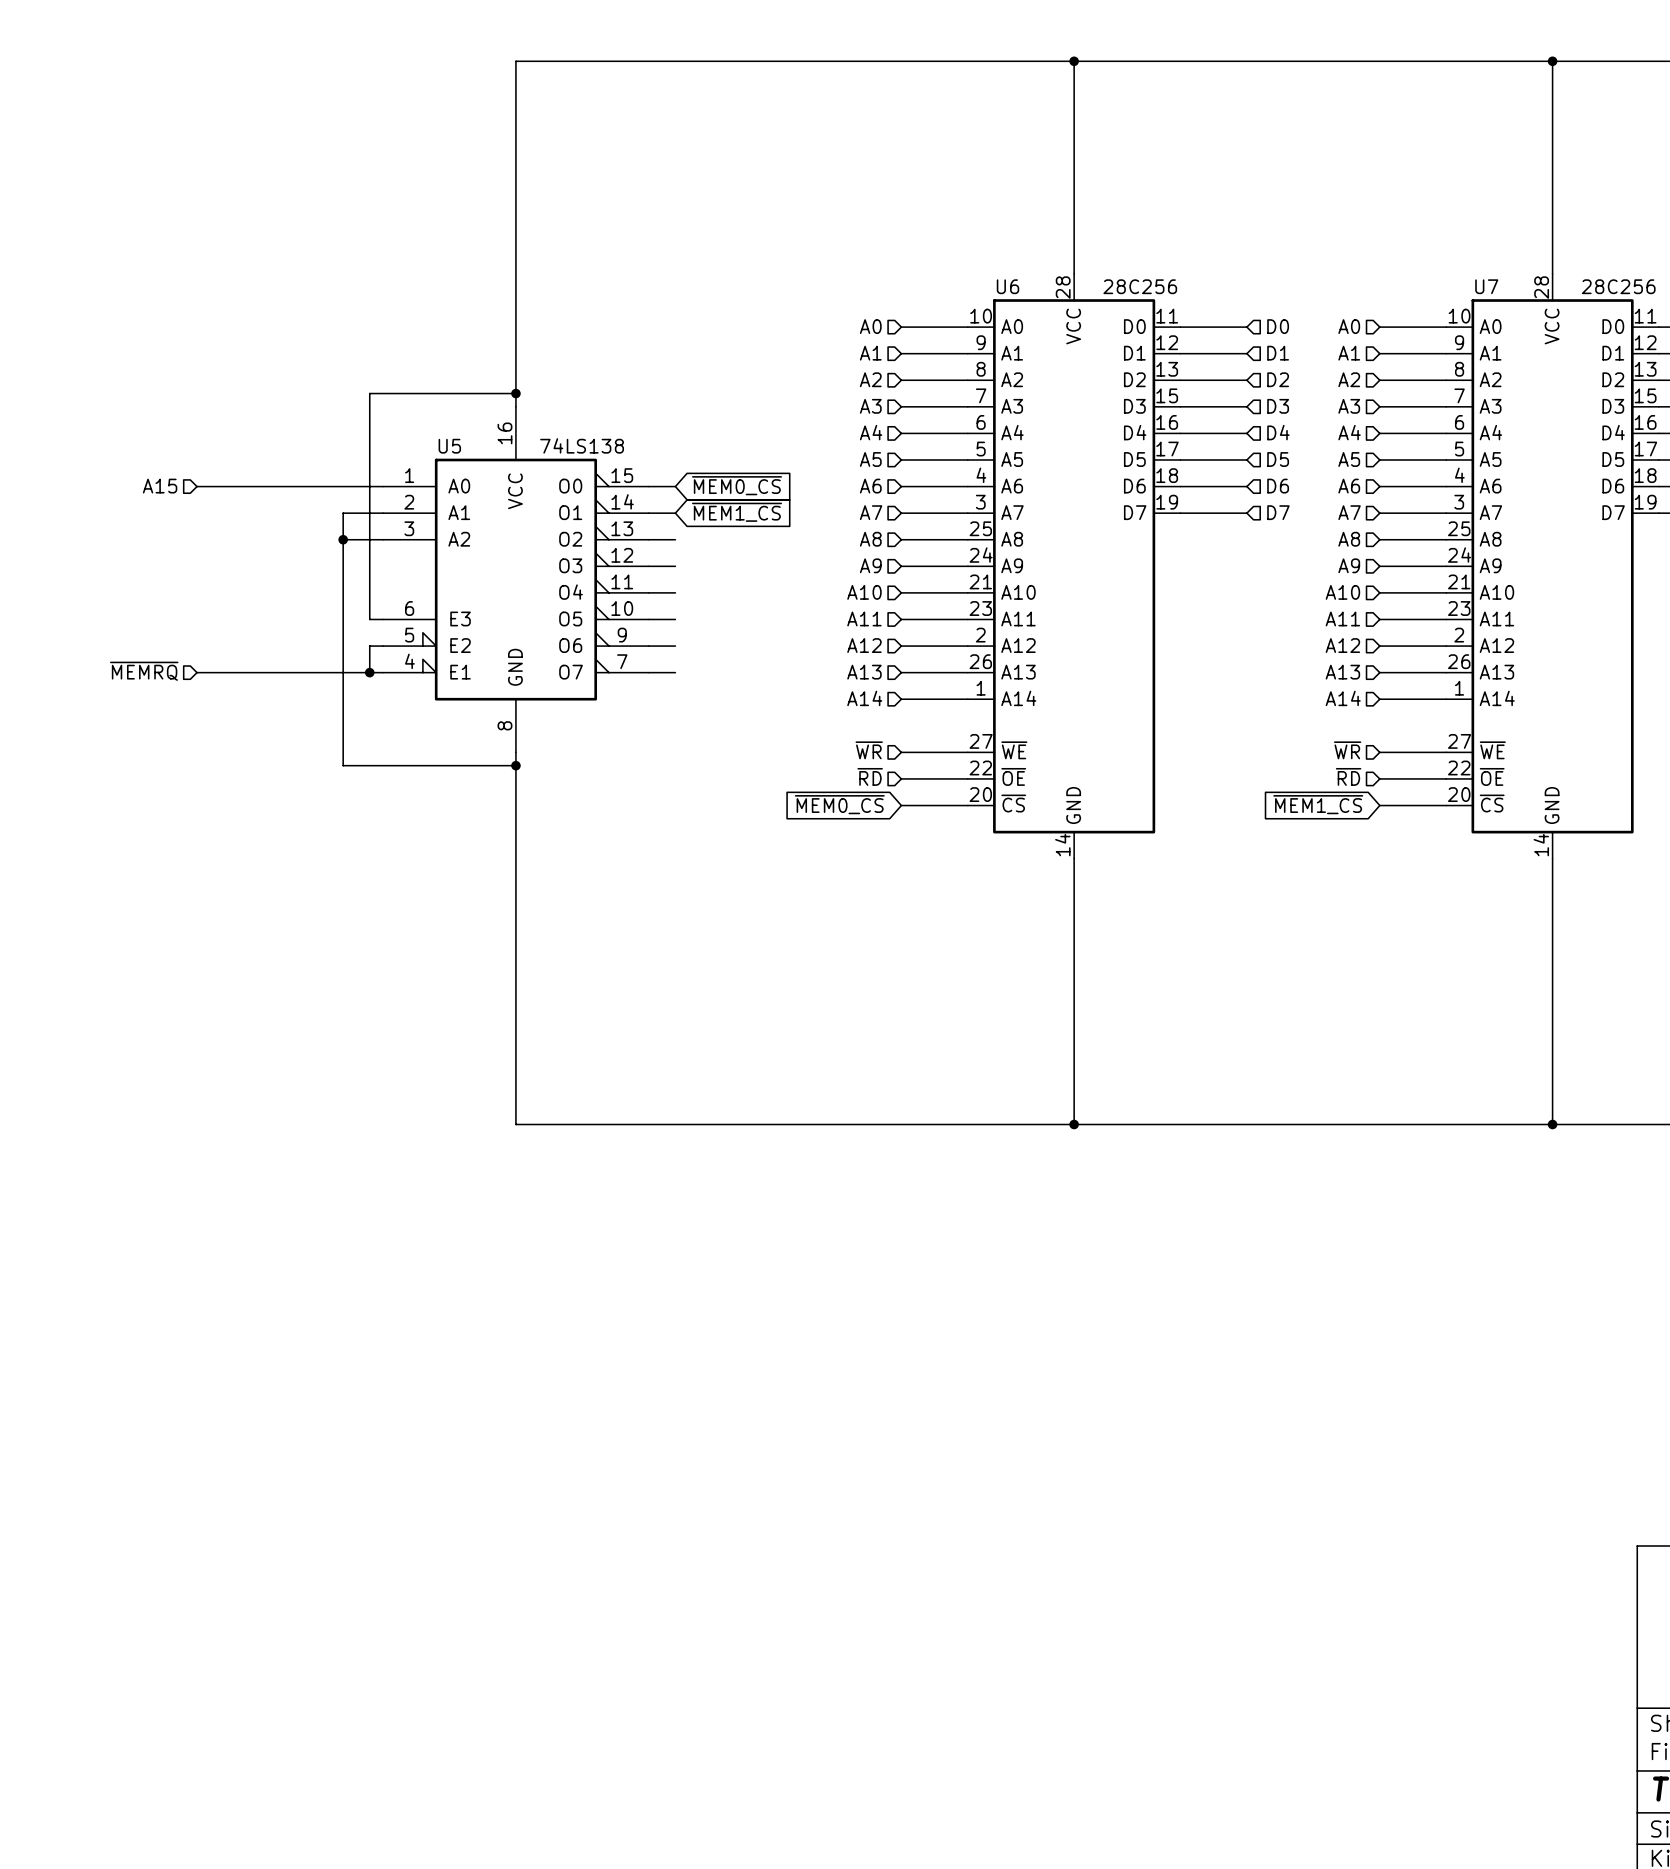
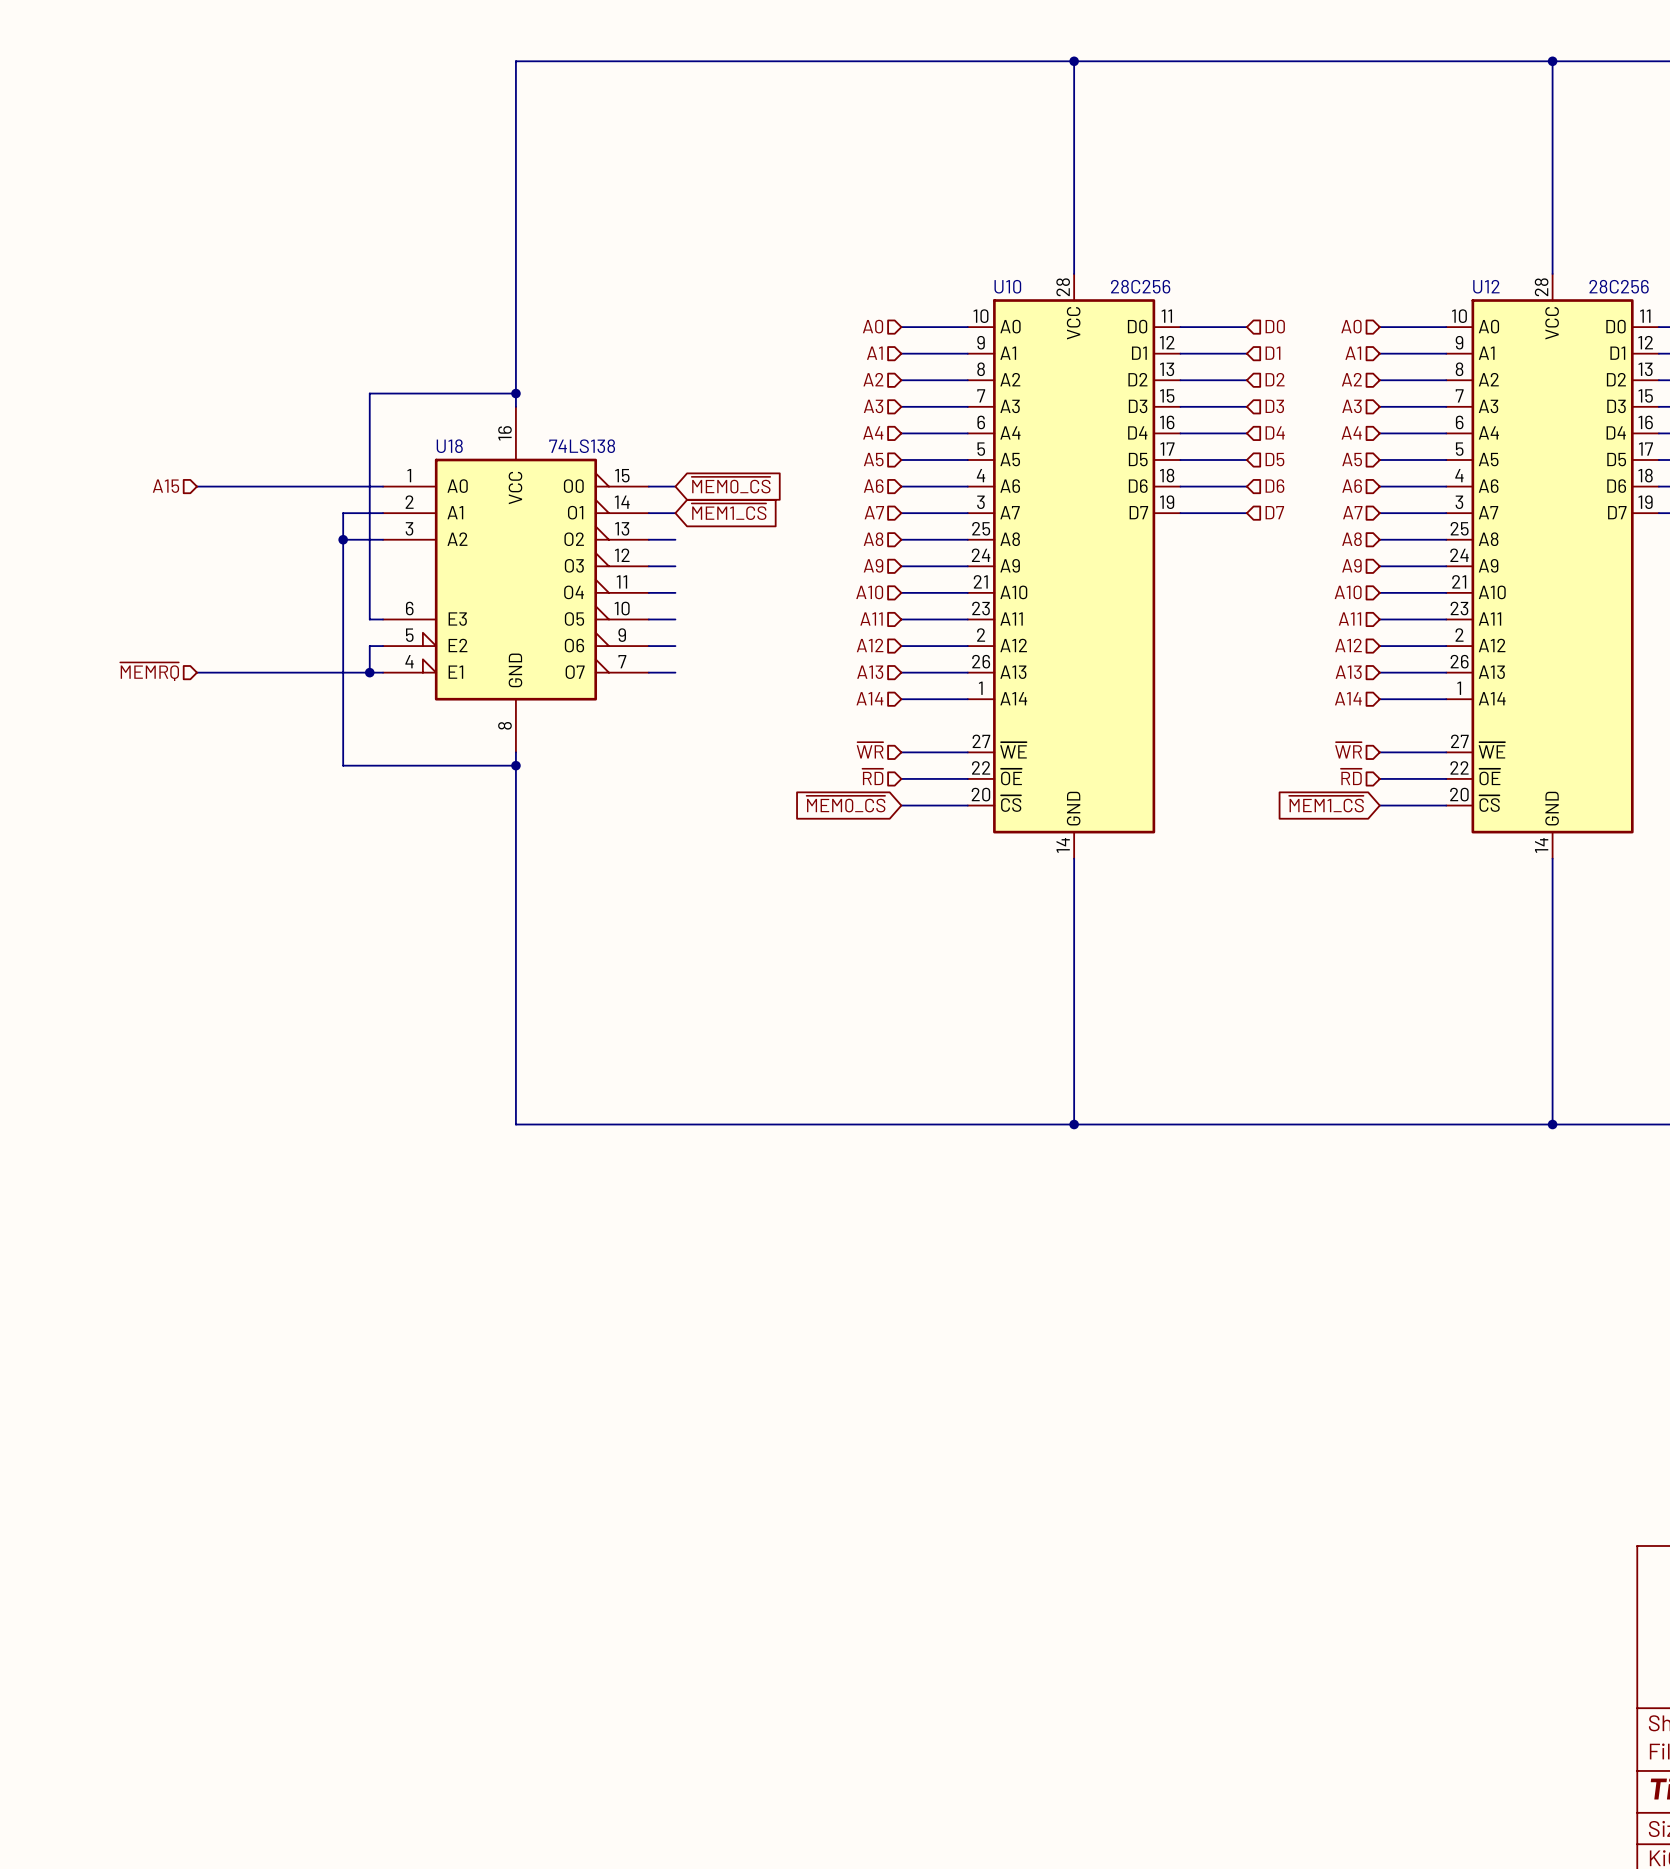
U6 name: U6 (1008, 286) -> U10 (1007, 286)
U7 name: U7 (1486, 286) -> U12 (1486, 286)
U5 name: U5 (449, 446) -> U18 (449, 446)

